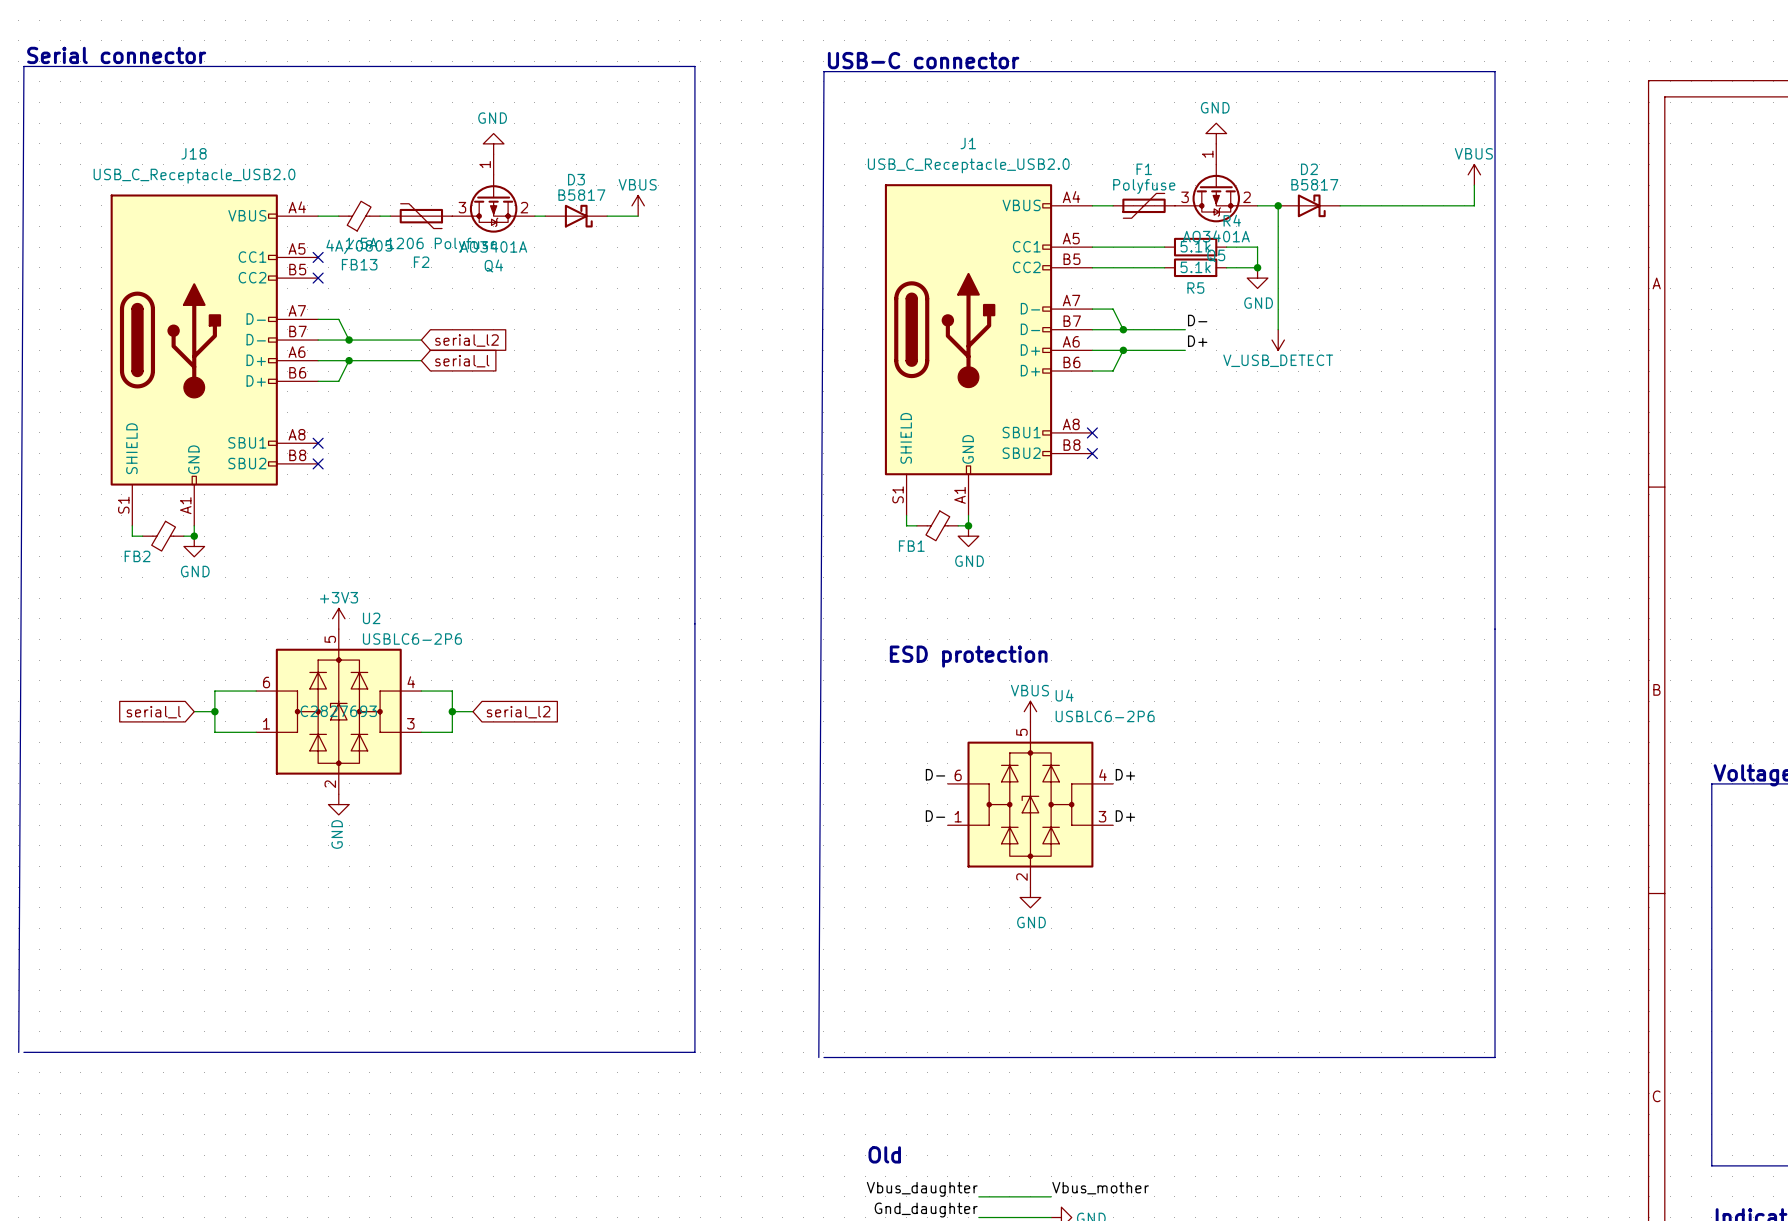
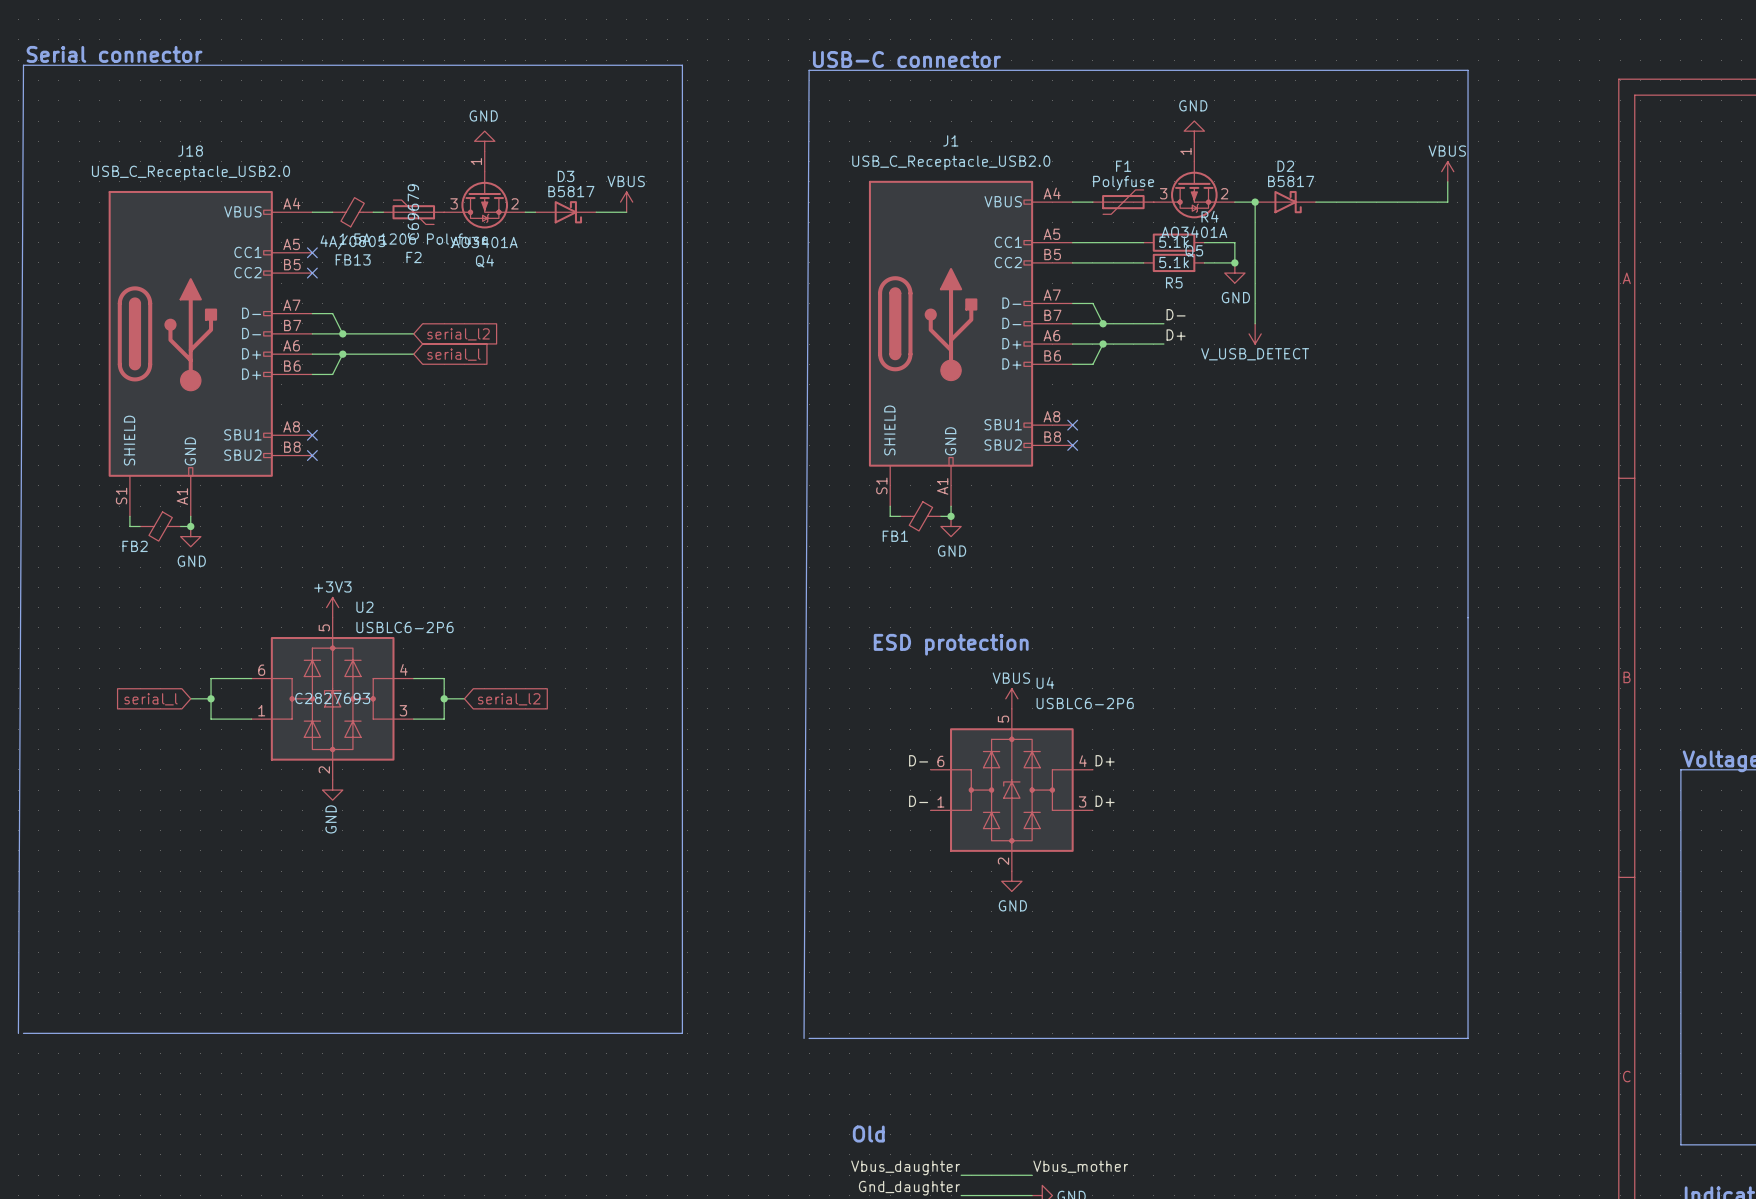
F2 text: none -> C69679 (413, 212)

